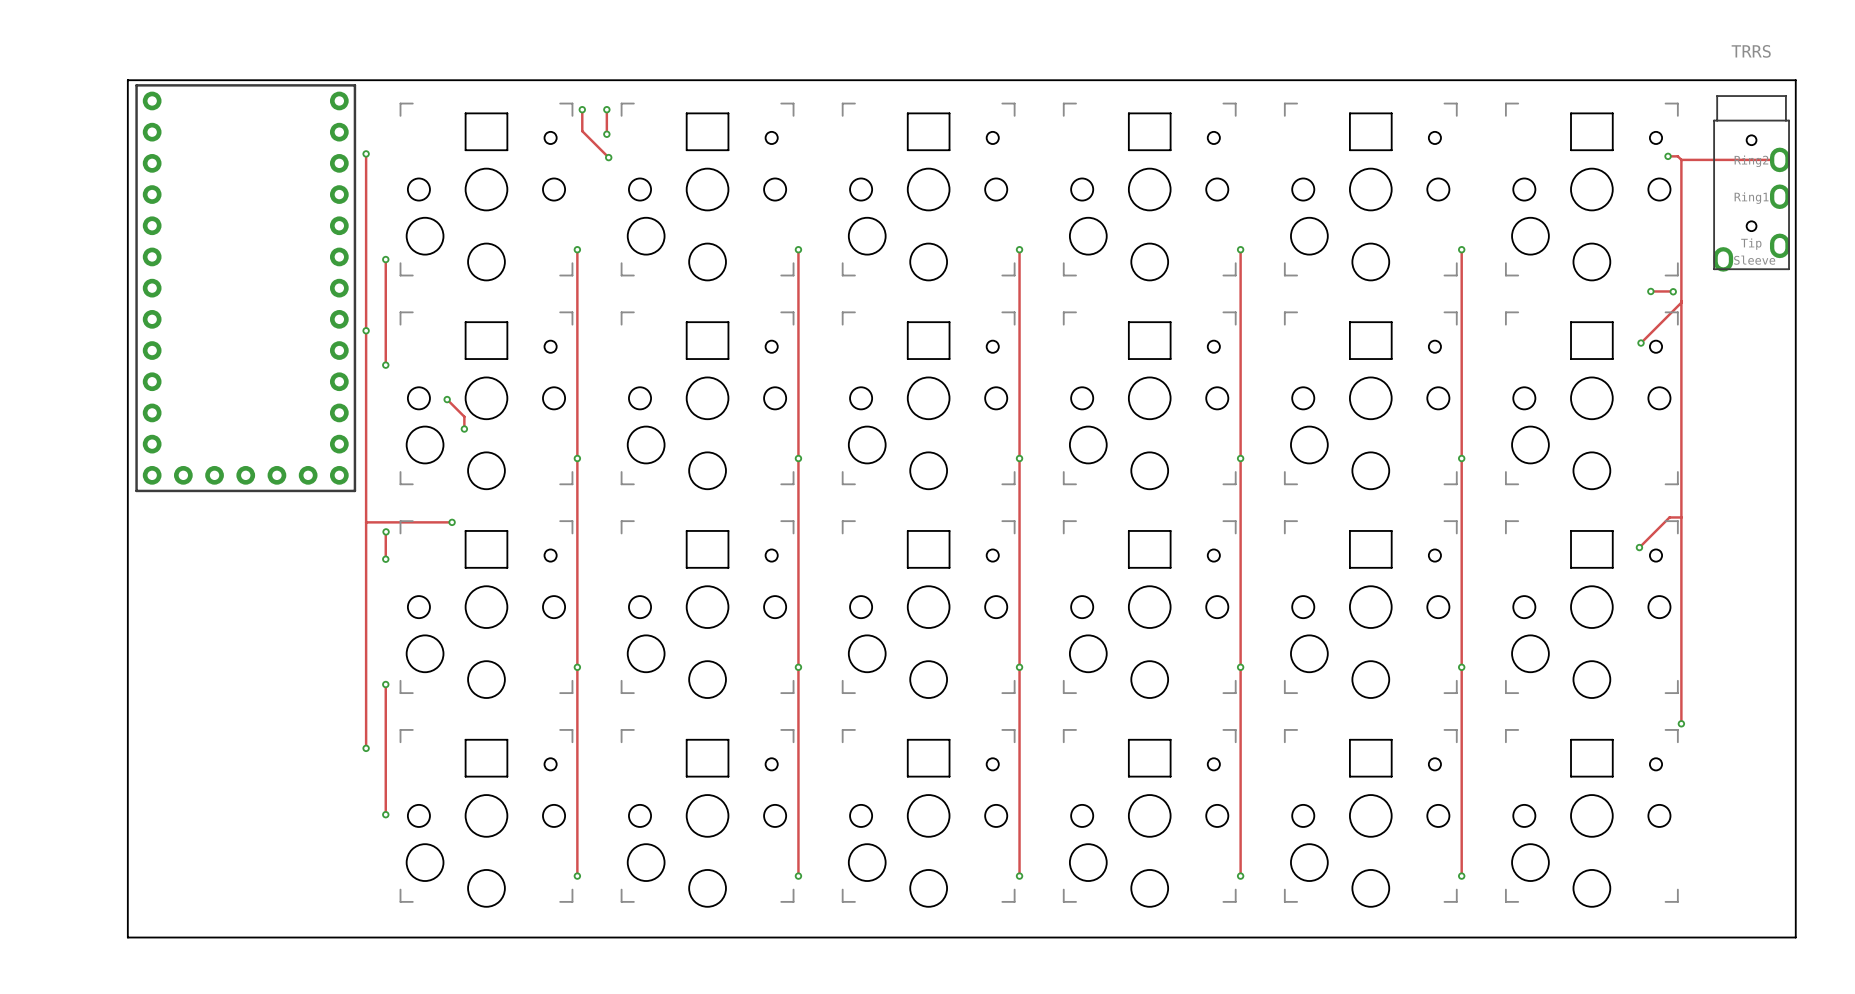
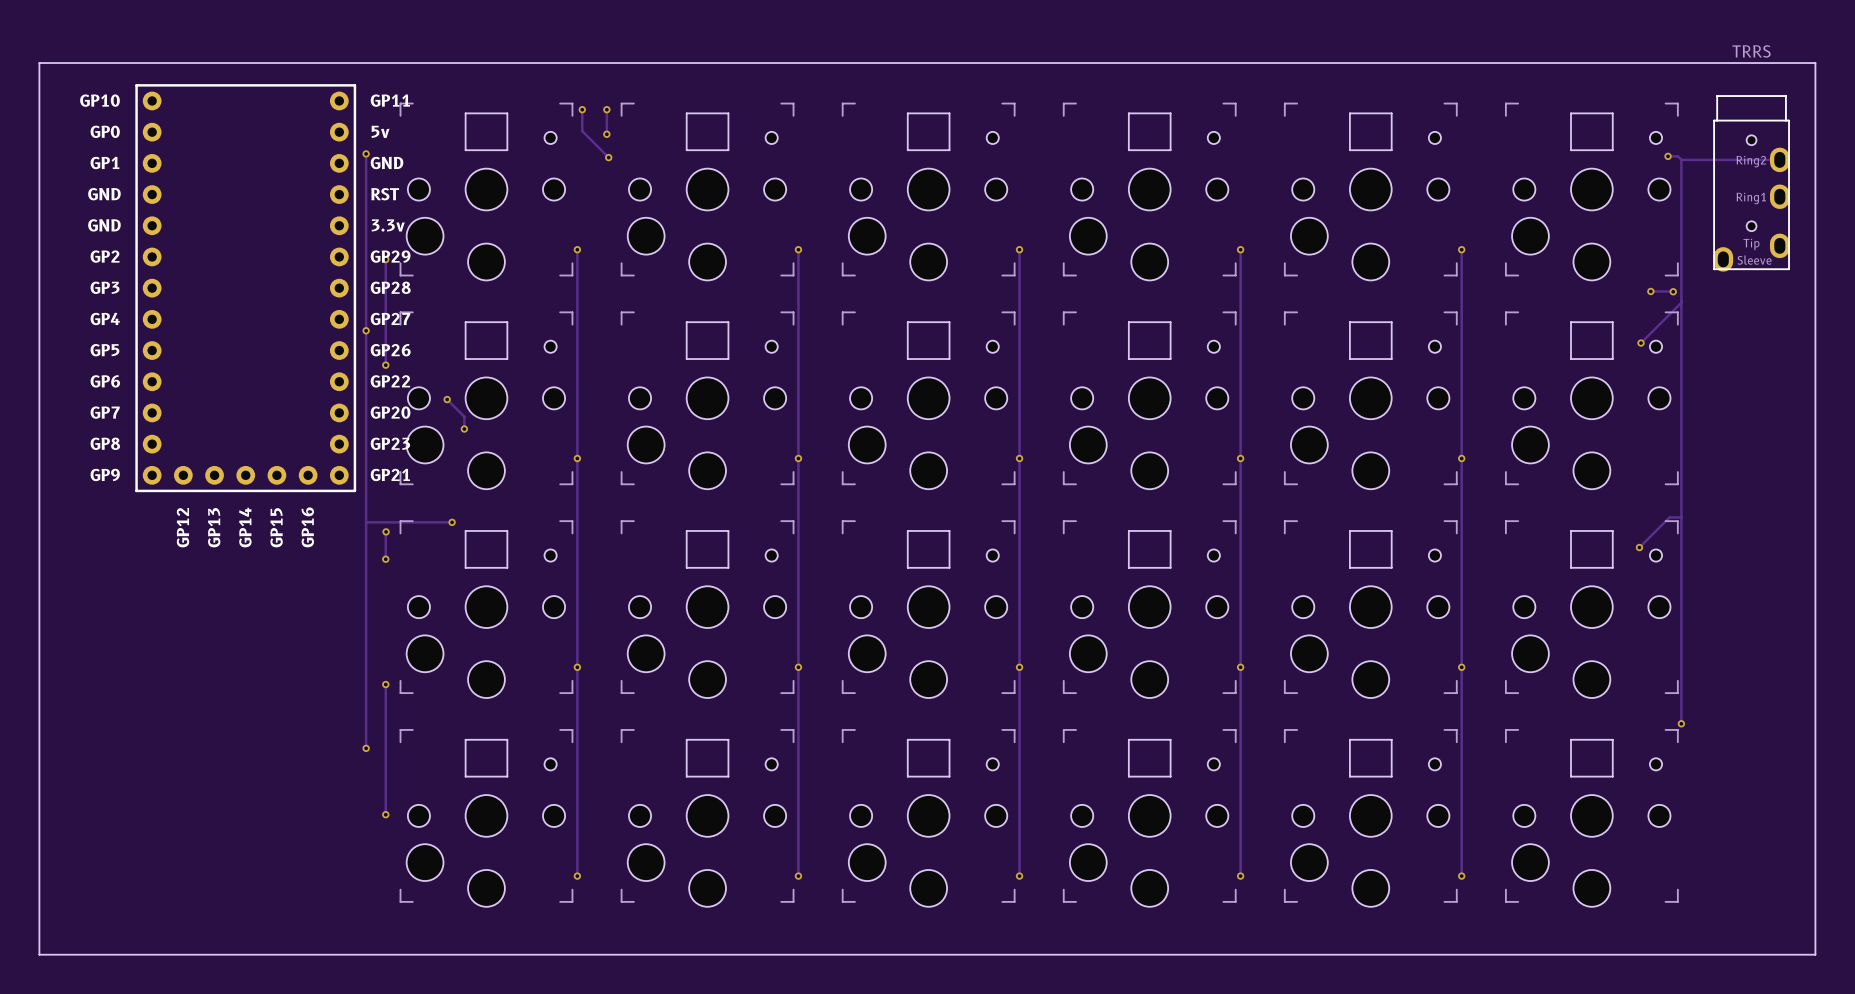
board edge: (127, 80) (1795, 80) (1795, 937) (127, 937) (127, 80) -> (39, 63) (39, 954) (1815, 954) (1815, 63) (39, 63)
part footprint: [135, 84, 357, 493] -> [135, 84, 357, 493]

